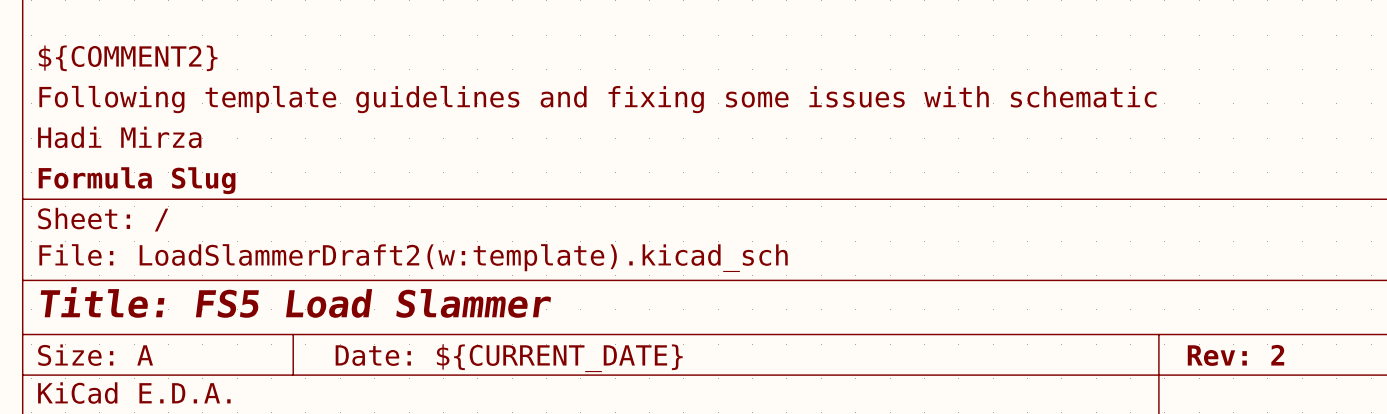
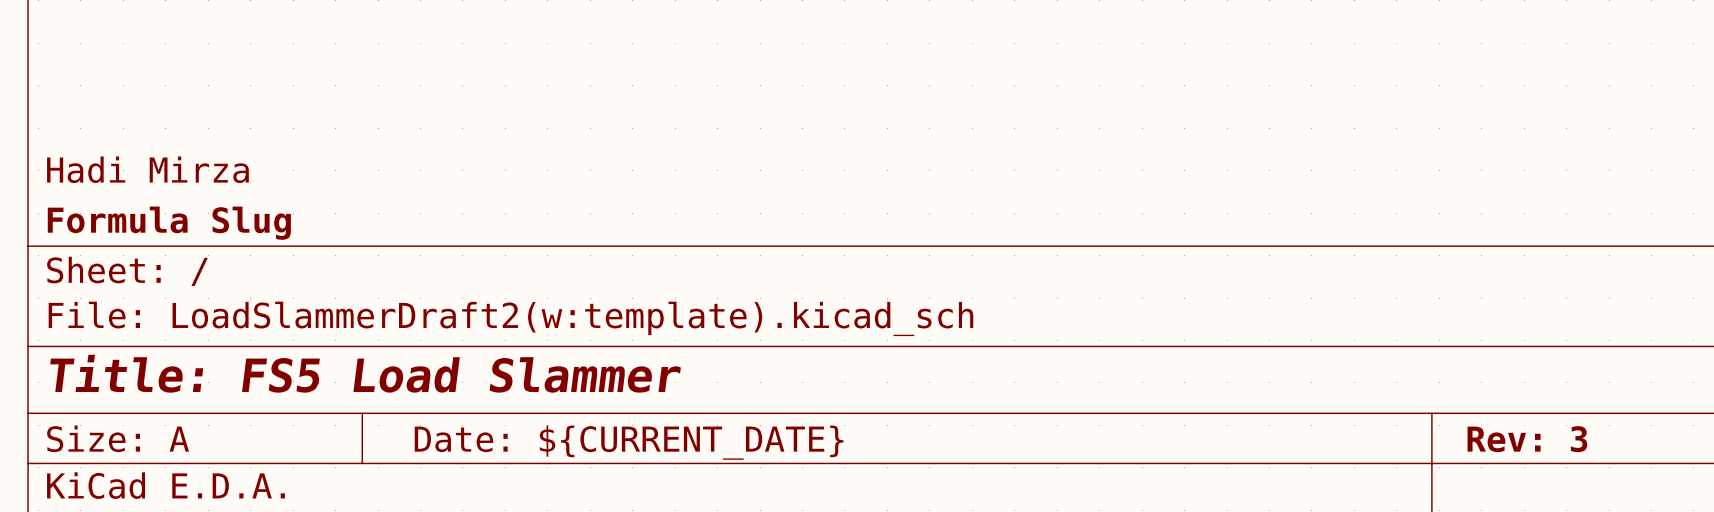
title block: ${COMMENT2} (128, 58) -> none
title block: Following template guidelines and fixing some issues with schematic (597, 99) -> none
title block: Rev: 2 (1235, 355) -> Rev: 3 (1527, 439)

